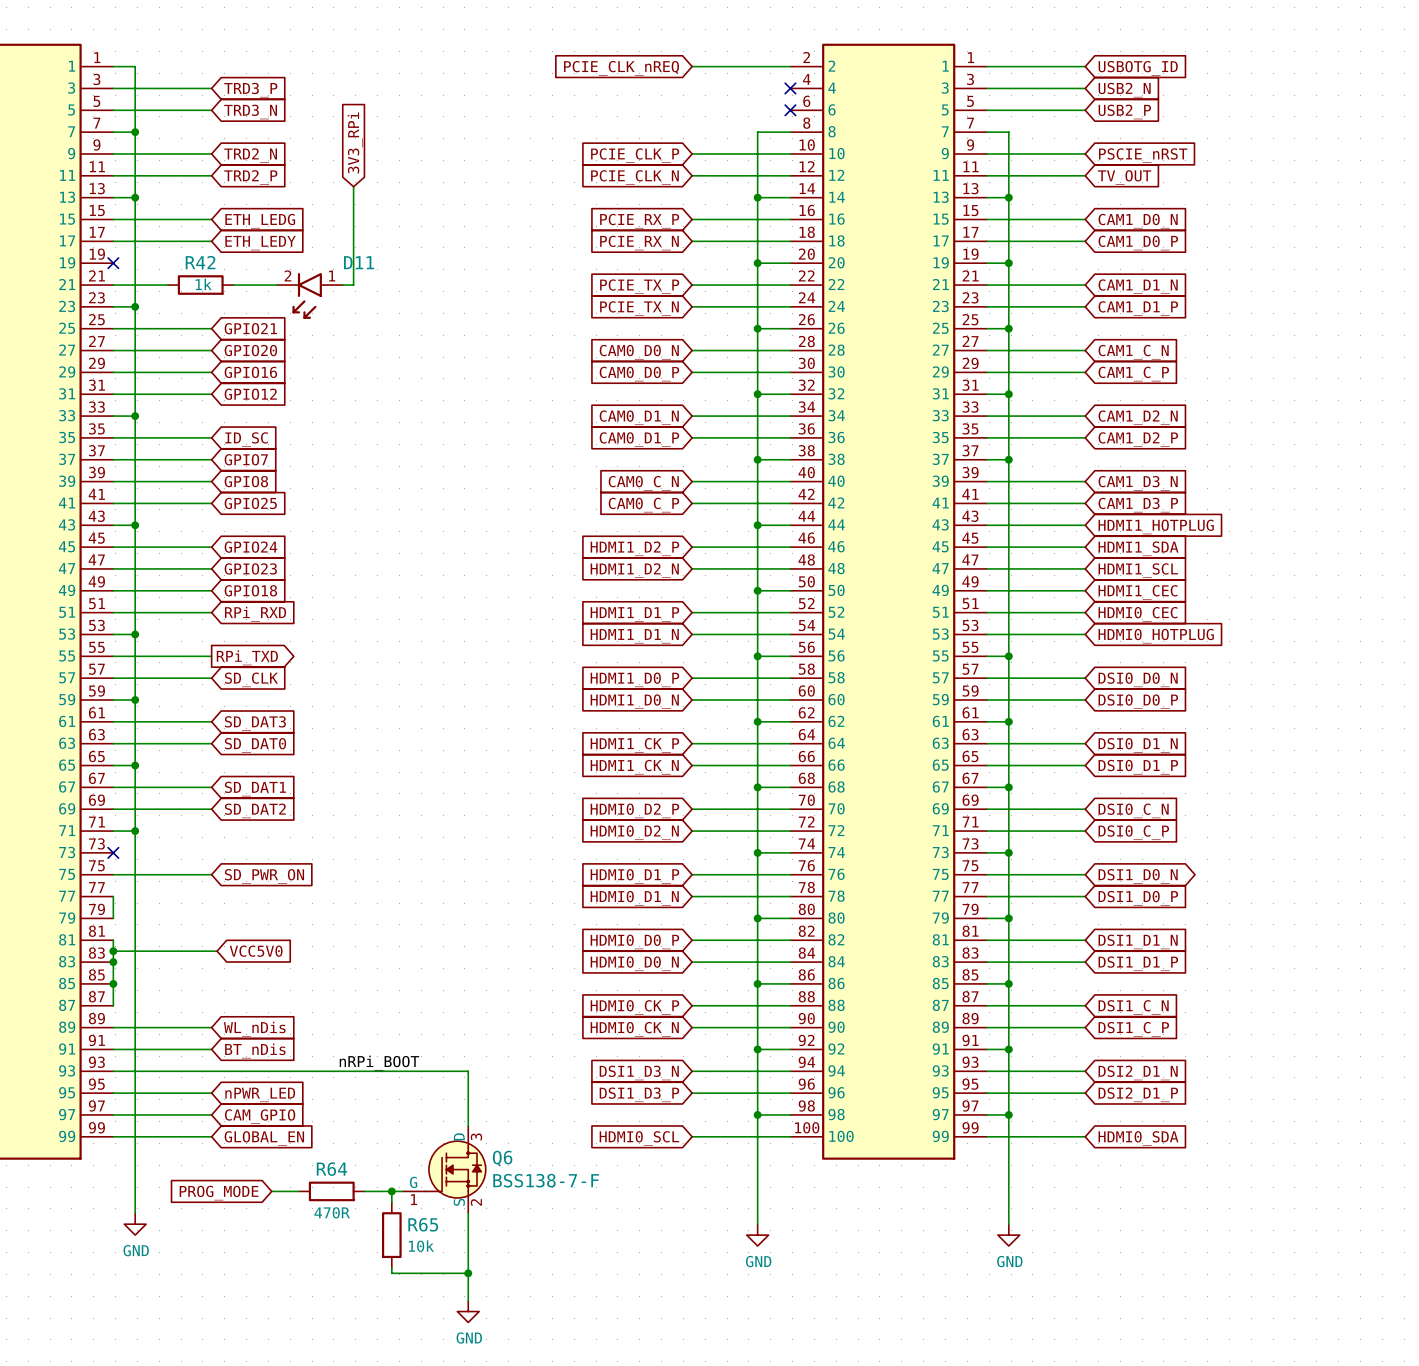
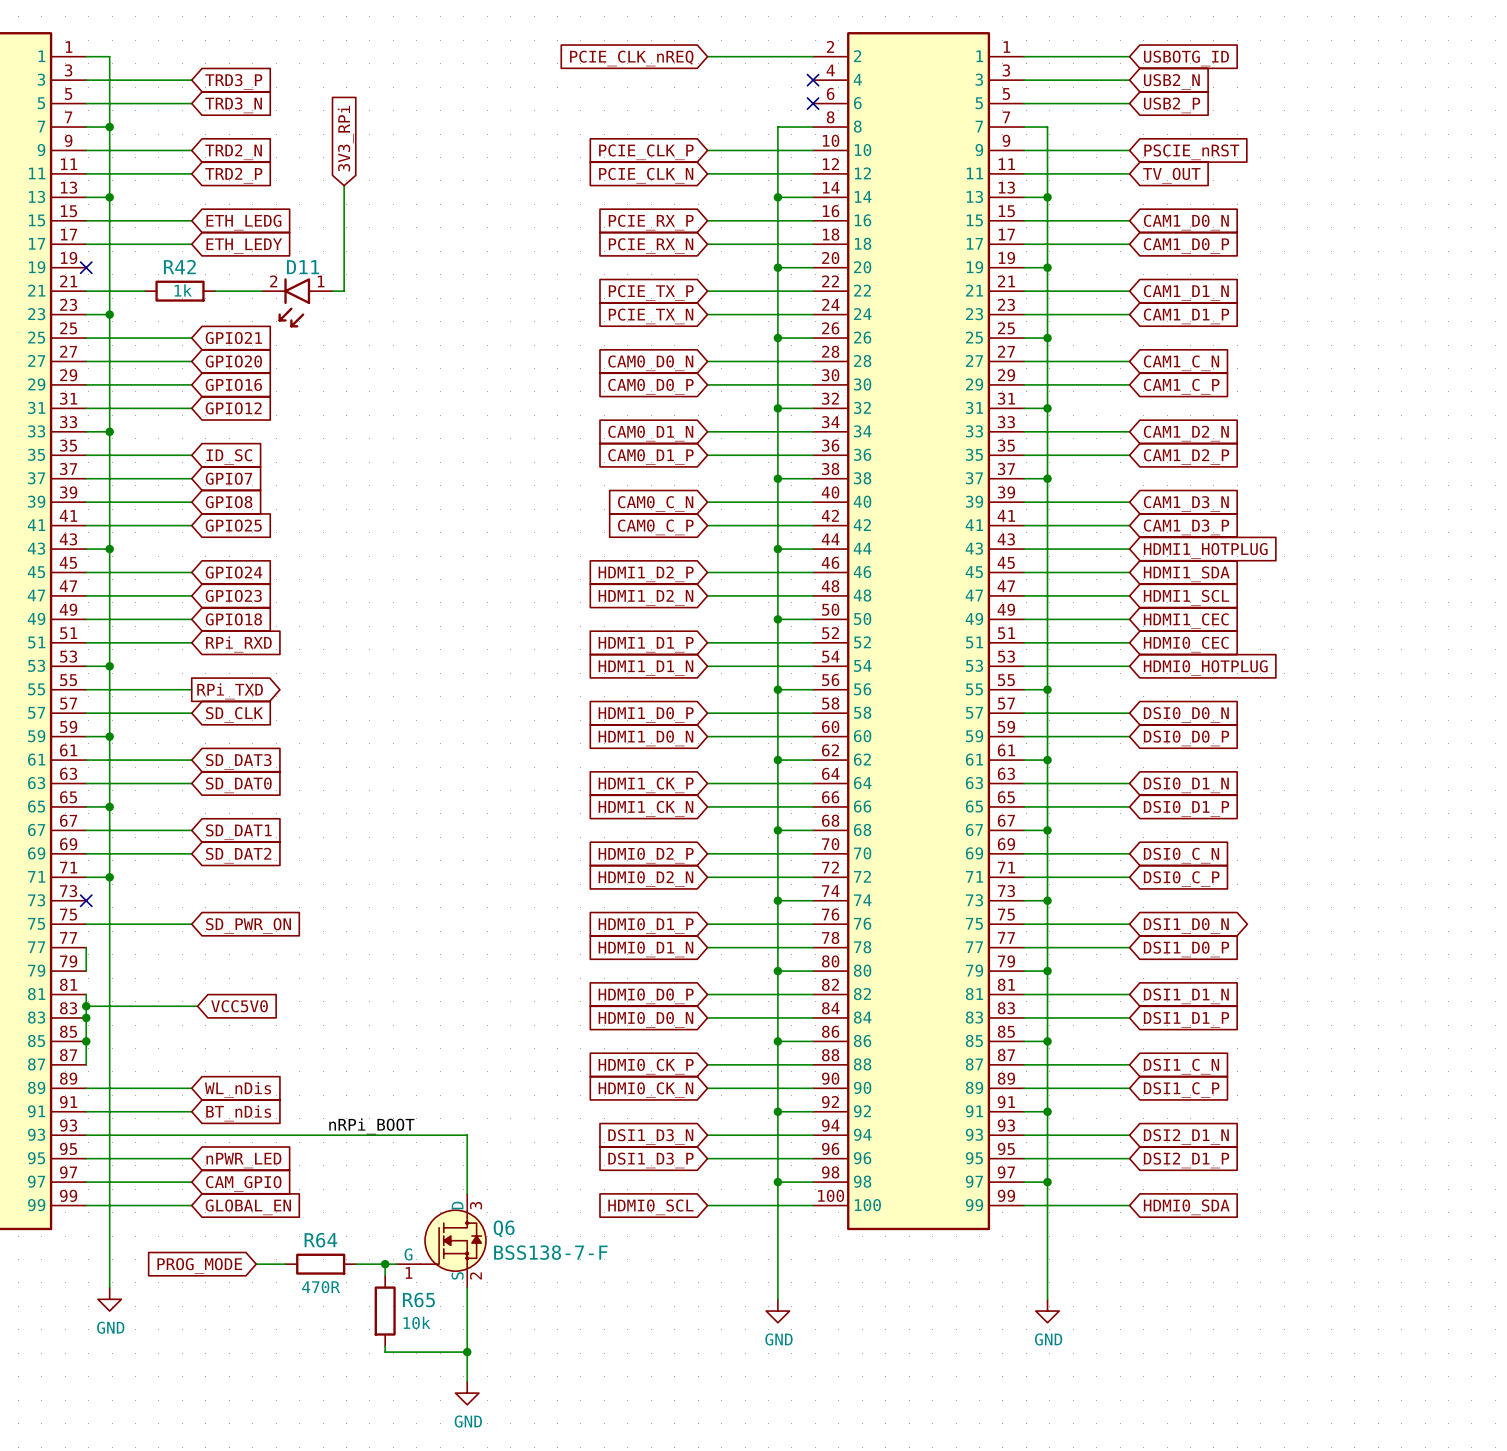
D11 name position: D11 (359, 262) -> D11 (303, 267)

